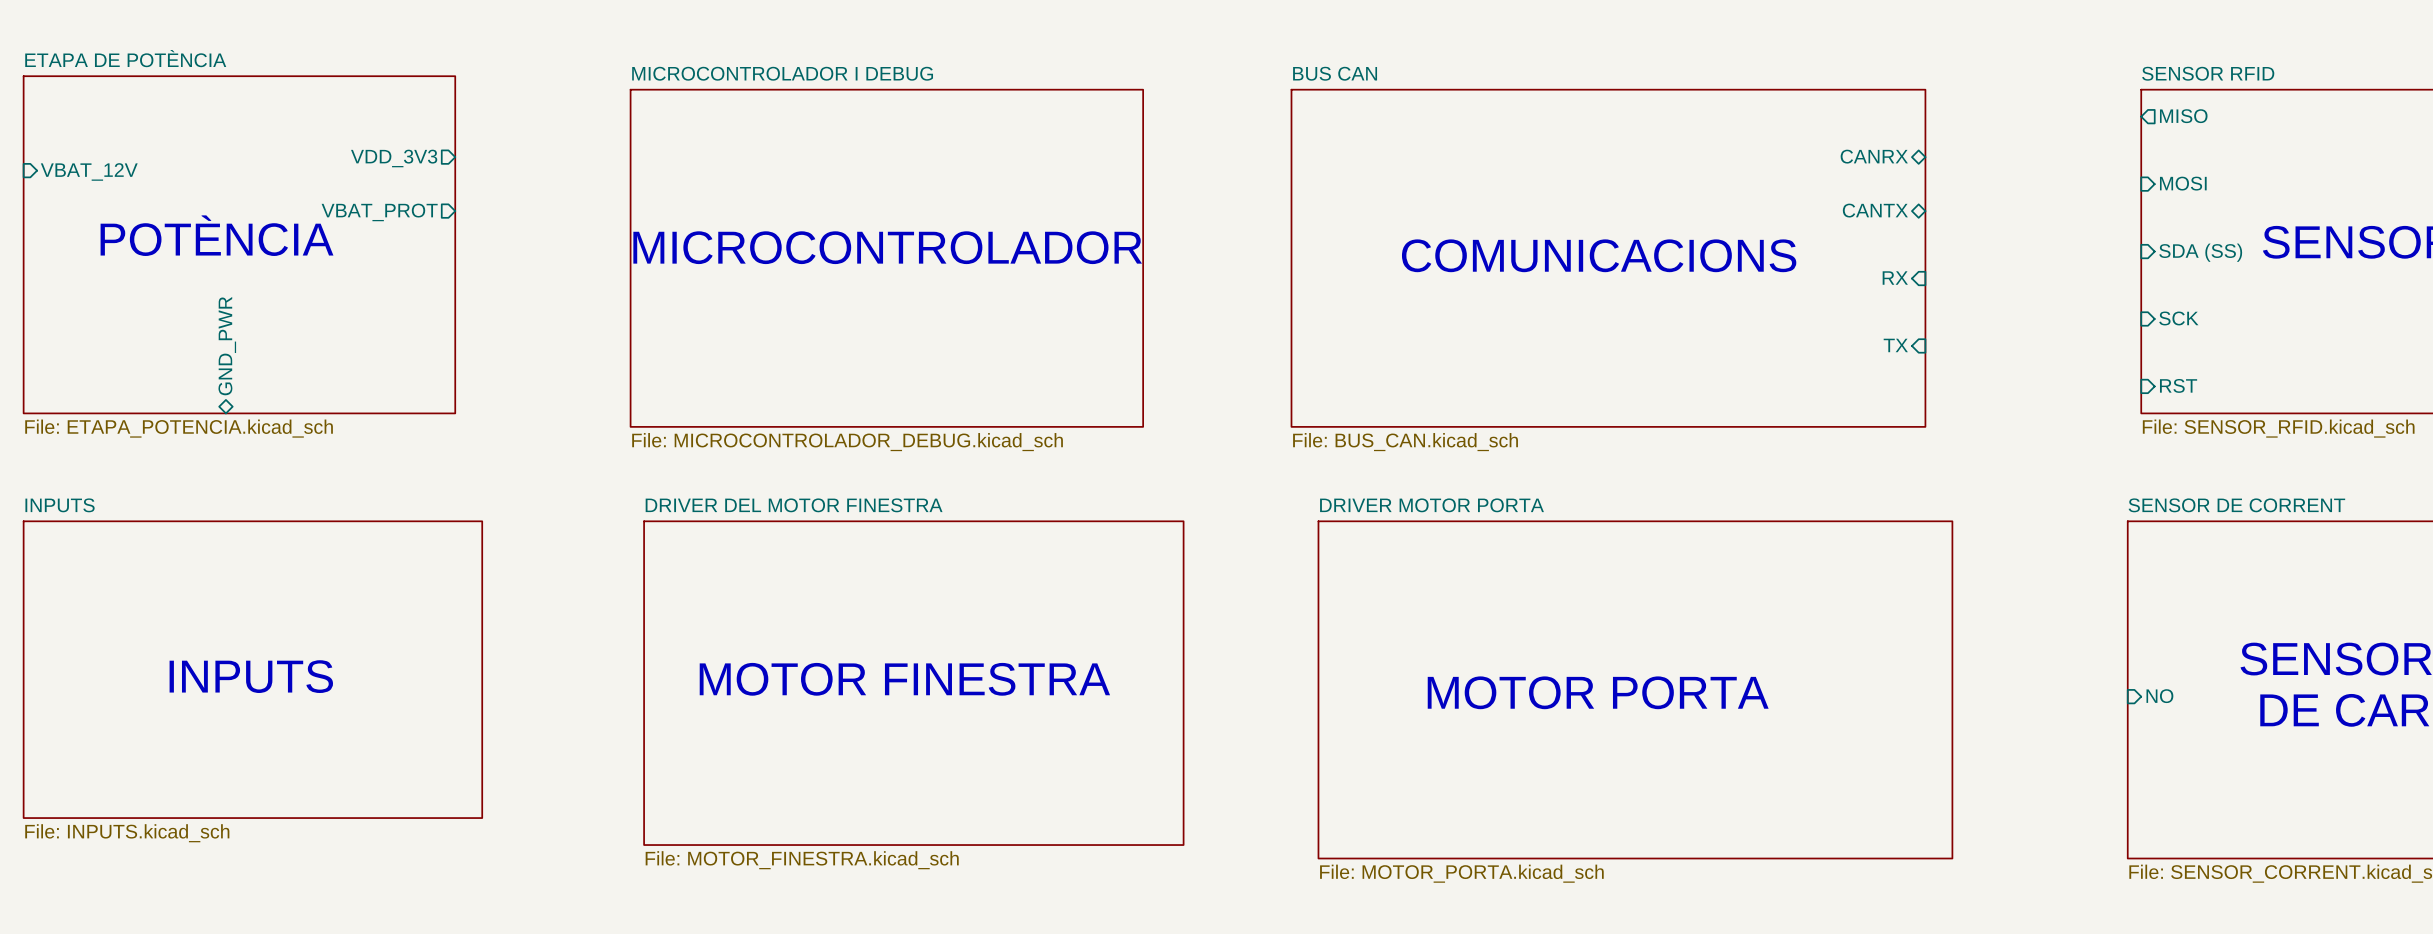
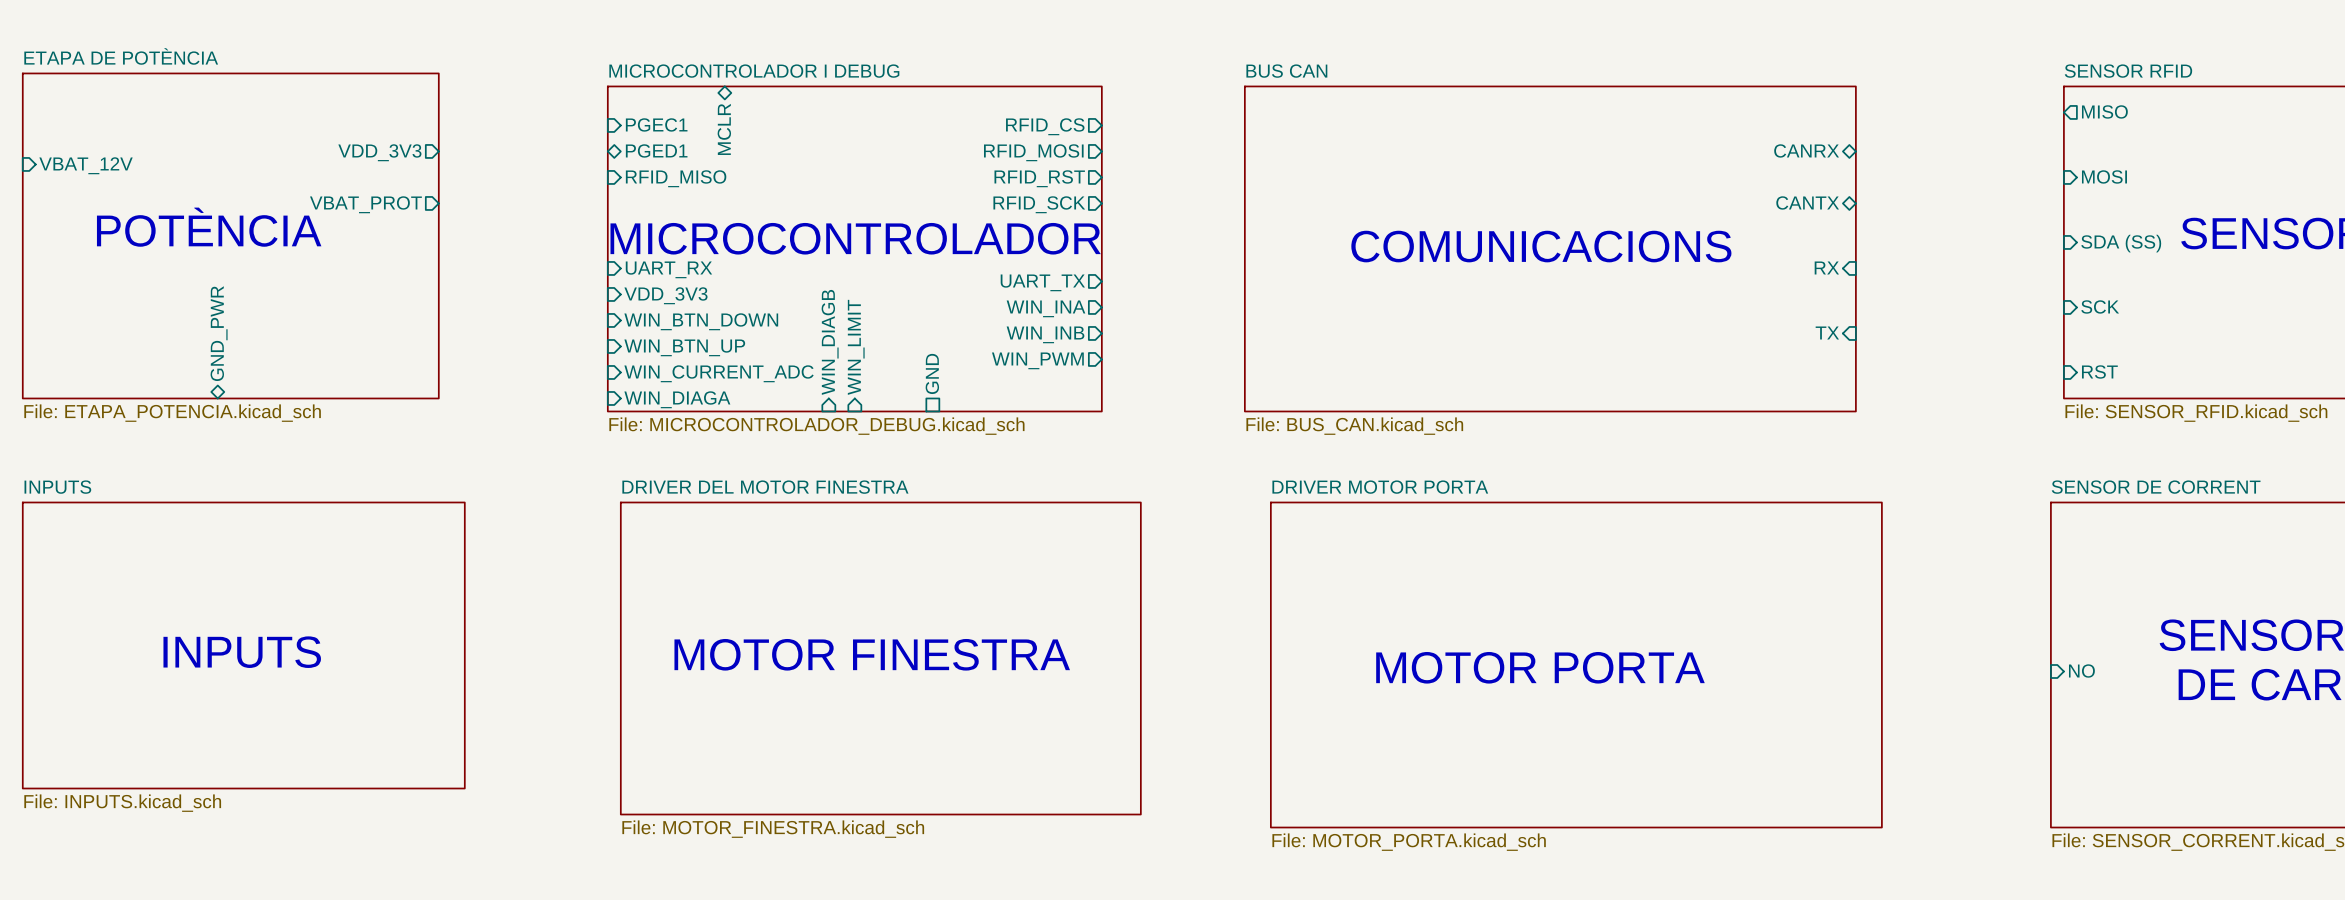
sheet pin: none -> PGEC1 (656, 124)
sheet pin: none -> RFID_CS (1045, 126)
sheet pin: none -> MCLR (724, 129)
sheet pin: none -> PGED1 (656, 150)
sheet pin: none -> RFID_MOSI (1033, 152)
sheet pin: none -> RFID_MISO (676, 178)
sheet pin: none -> RFID_RST (1039, 178)
sheet pin: none -> RFID_SCK (1039, 204)
sheet pin: none -> UART_RX (668, 269)
sheet pin: none -> UART_TX (1042, 282)
sheet pin: none -> VDD_3V3 (665, 295)
sheet pin: none -> WIN_INA (1045, 308)
sheet pin: none -> WIN_BTN_DOWN (701, 321)
sheet pin: none -> WIN_INB (1045, 334)
sheet pin: none -> WIN_DIAGB (830, 342)
sheet pin: none -> WIN_BTN_UP (684, 347)
sheet pin: none -> WIN_LIMIT (856, 347)
sheet pin: none -> WIN_PWM (1037, 360)
sheet pin: none -> WIN_CURRENT_ADC (719, 373)
sheet pin: none -> GND (932, 373)
sheet pin: none -> WIN_DIAGA (677, 399)

